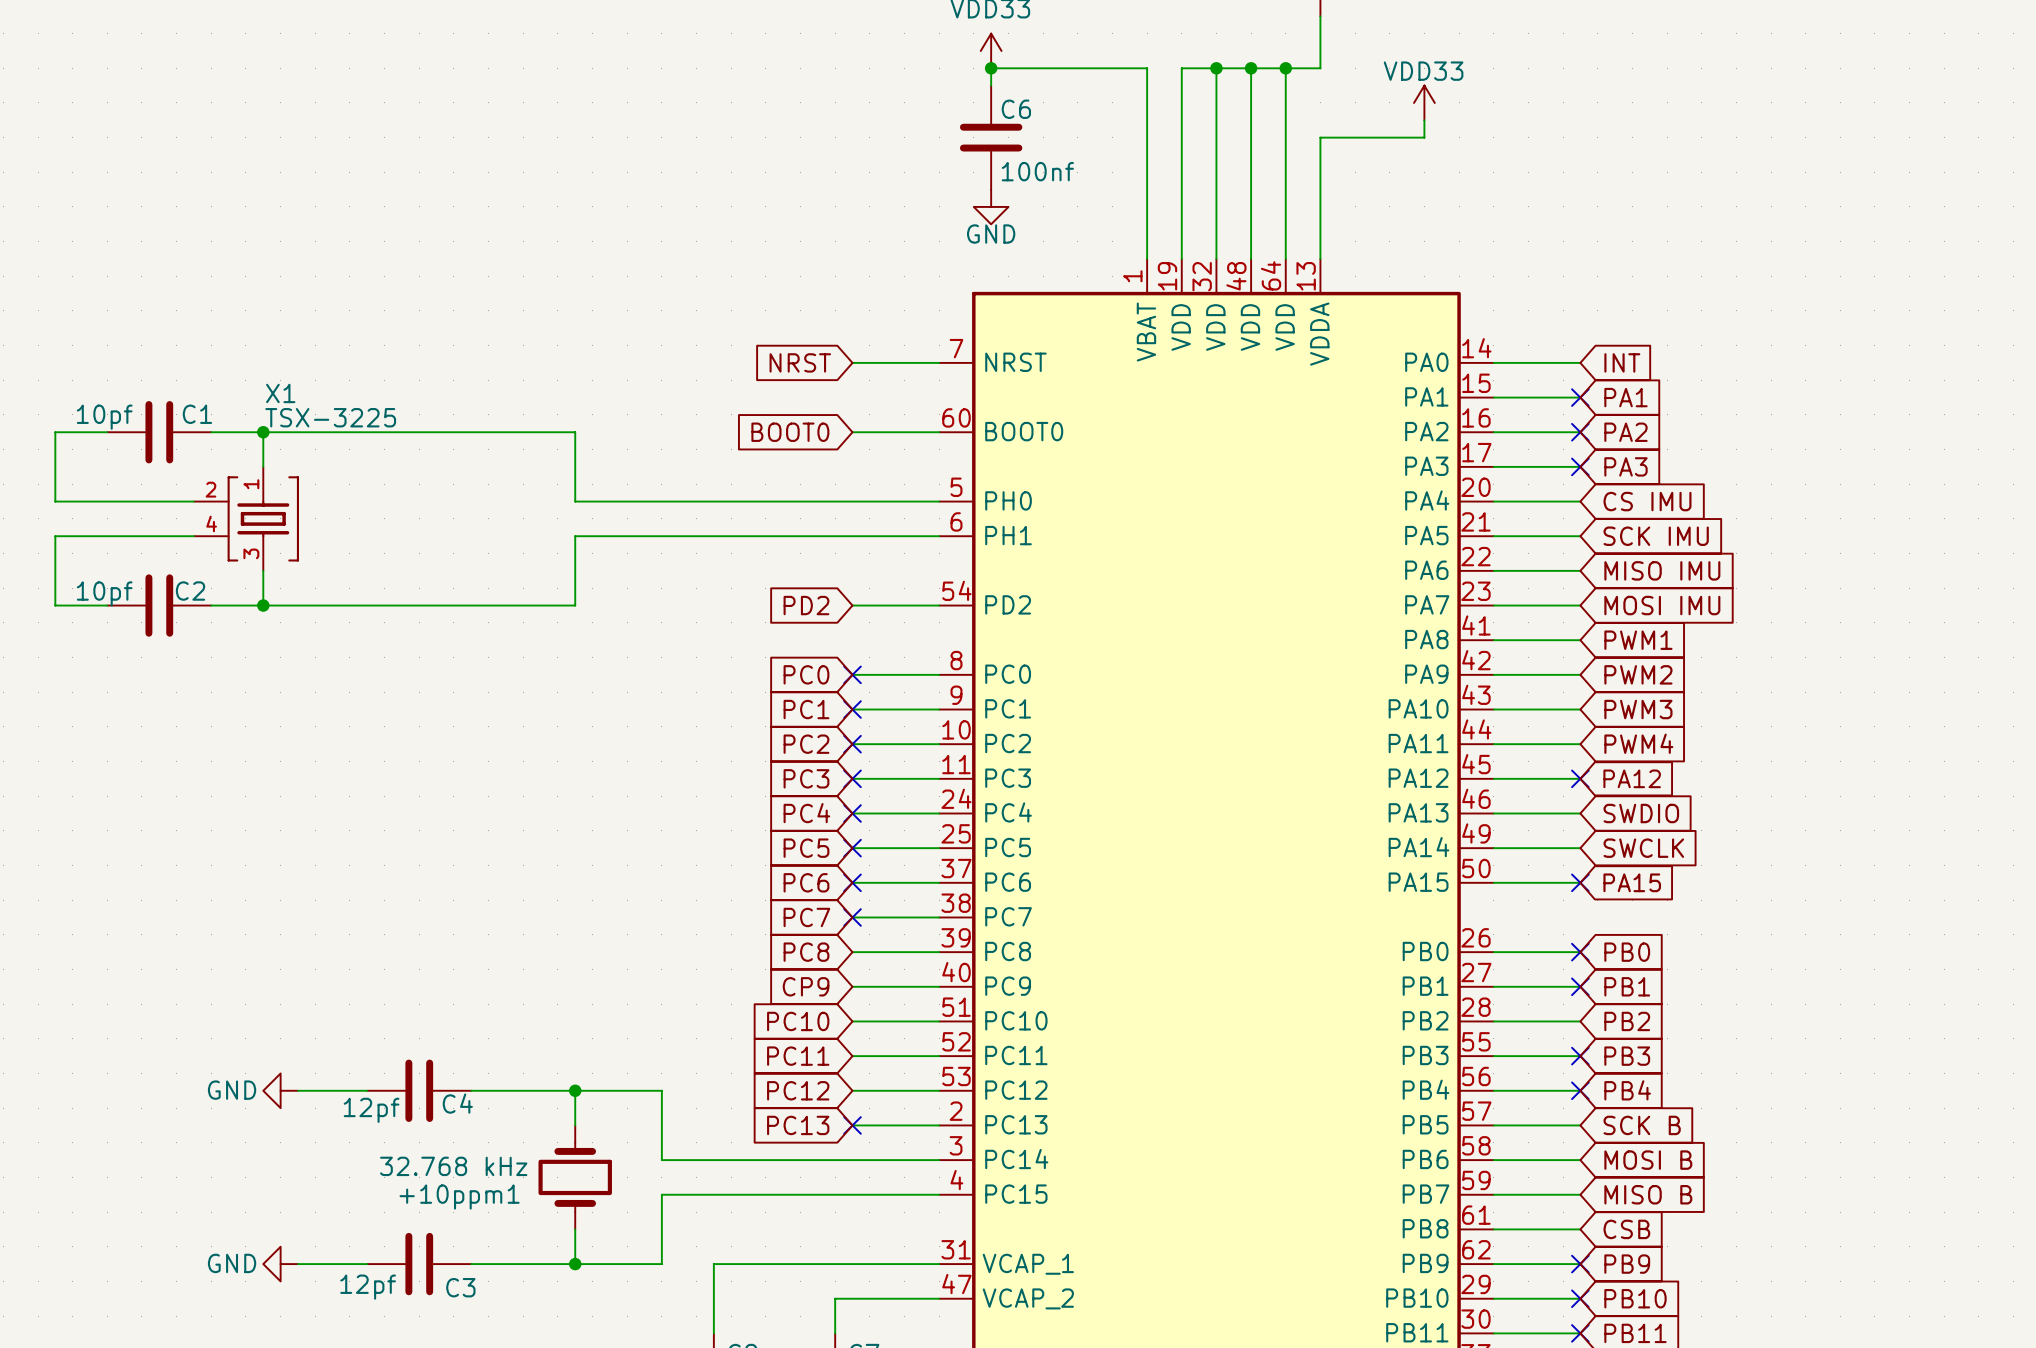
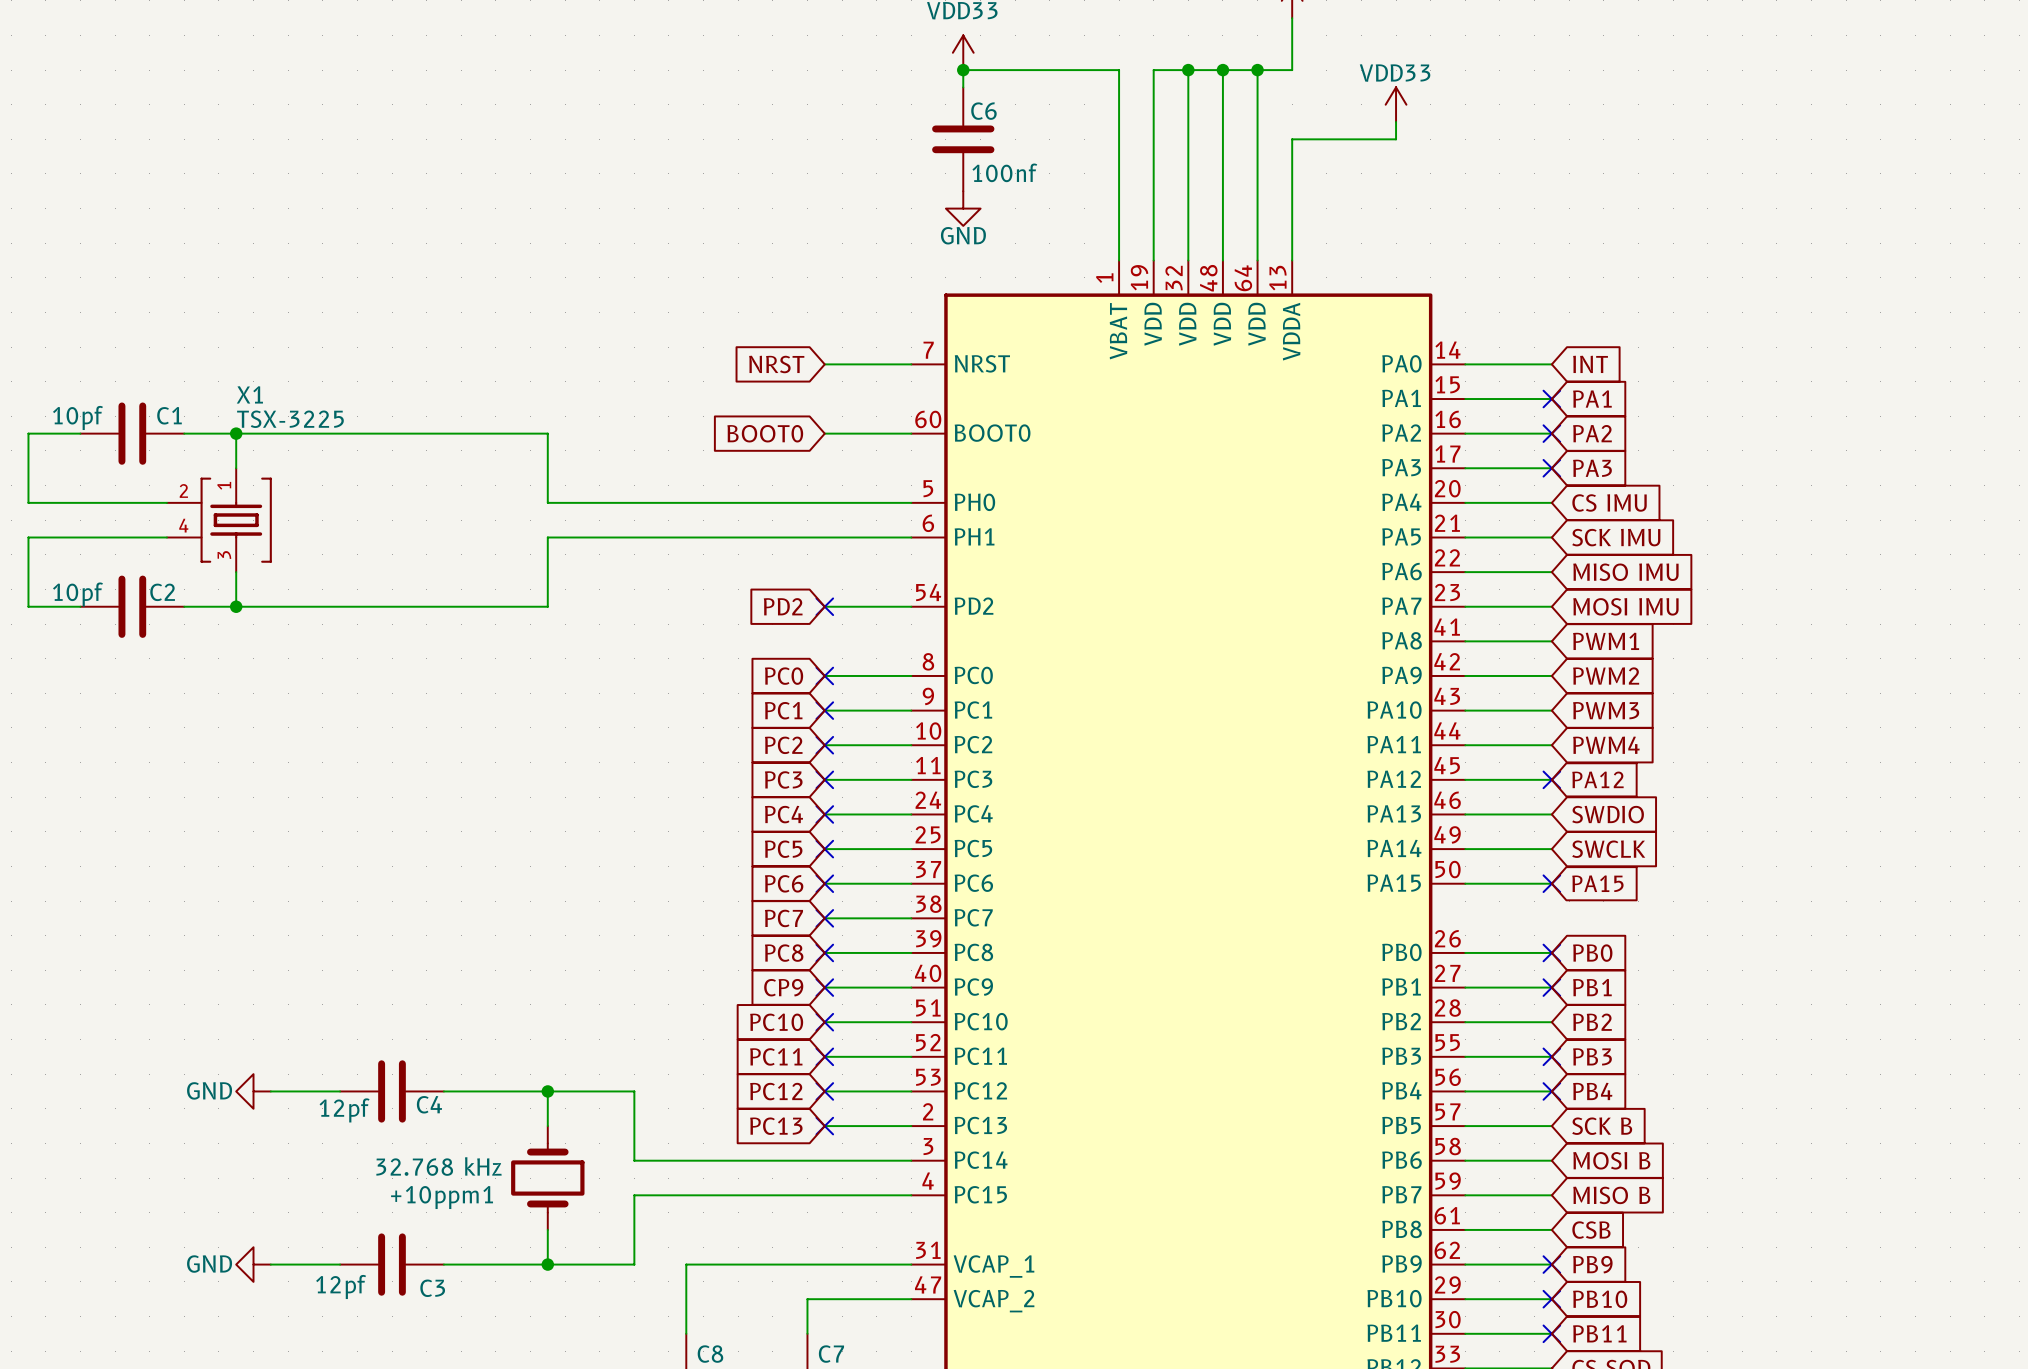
no-connect mark: none -> (824, 606)
no-connect mark: none -> (824, 952)
no-connect mark: none -> (824, 987)
no-connect mark: none -> (824, 1022)
no-connect mark: none -> (824, 1056)
no-connect mark: none -> (824, 1091)

